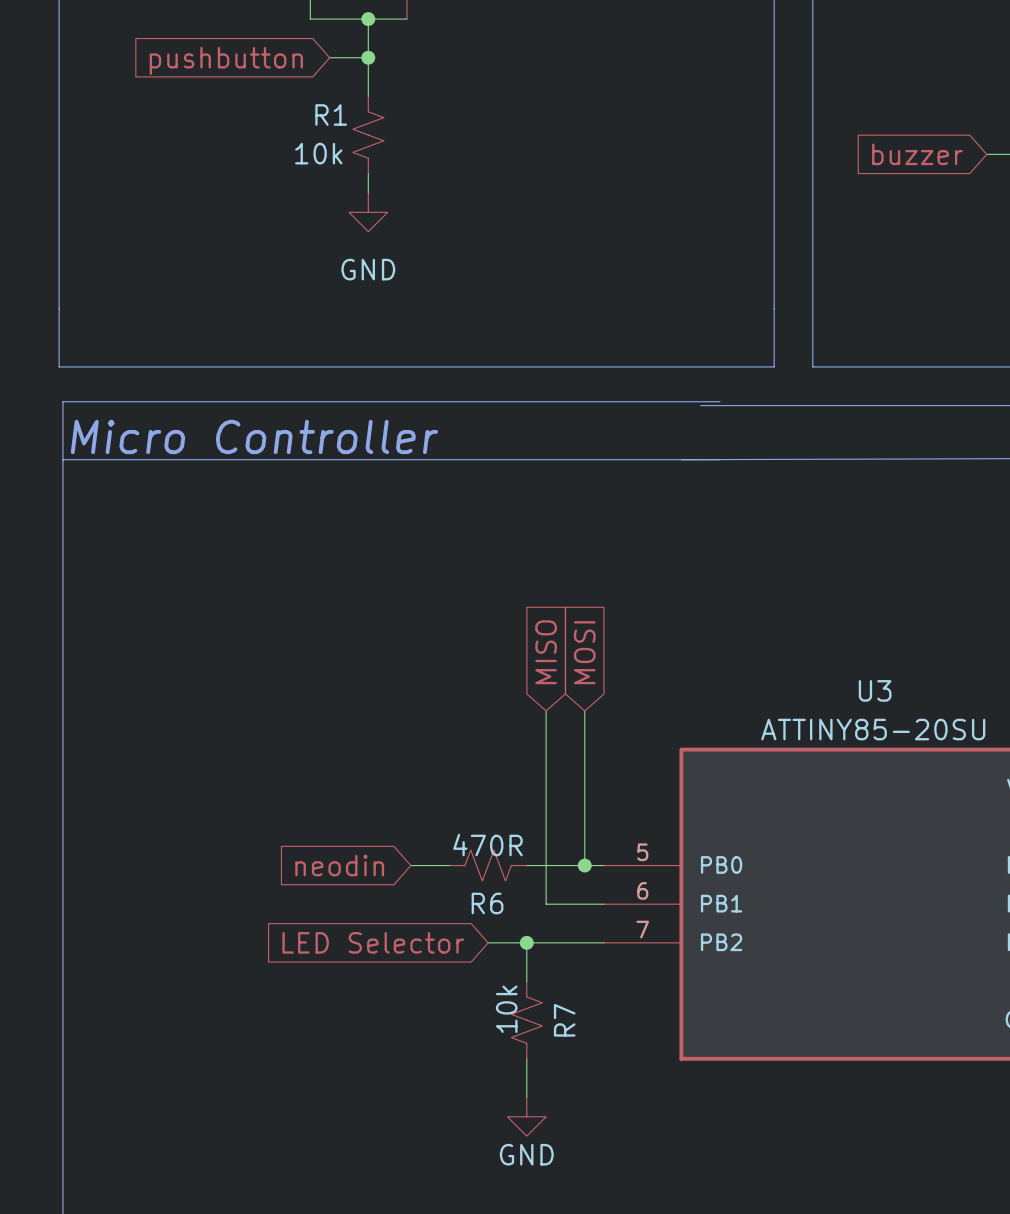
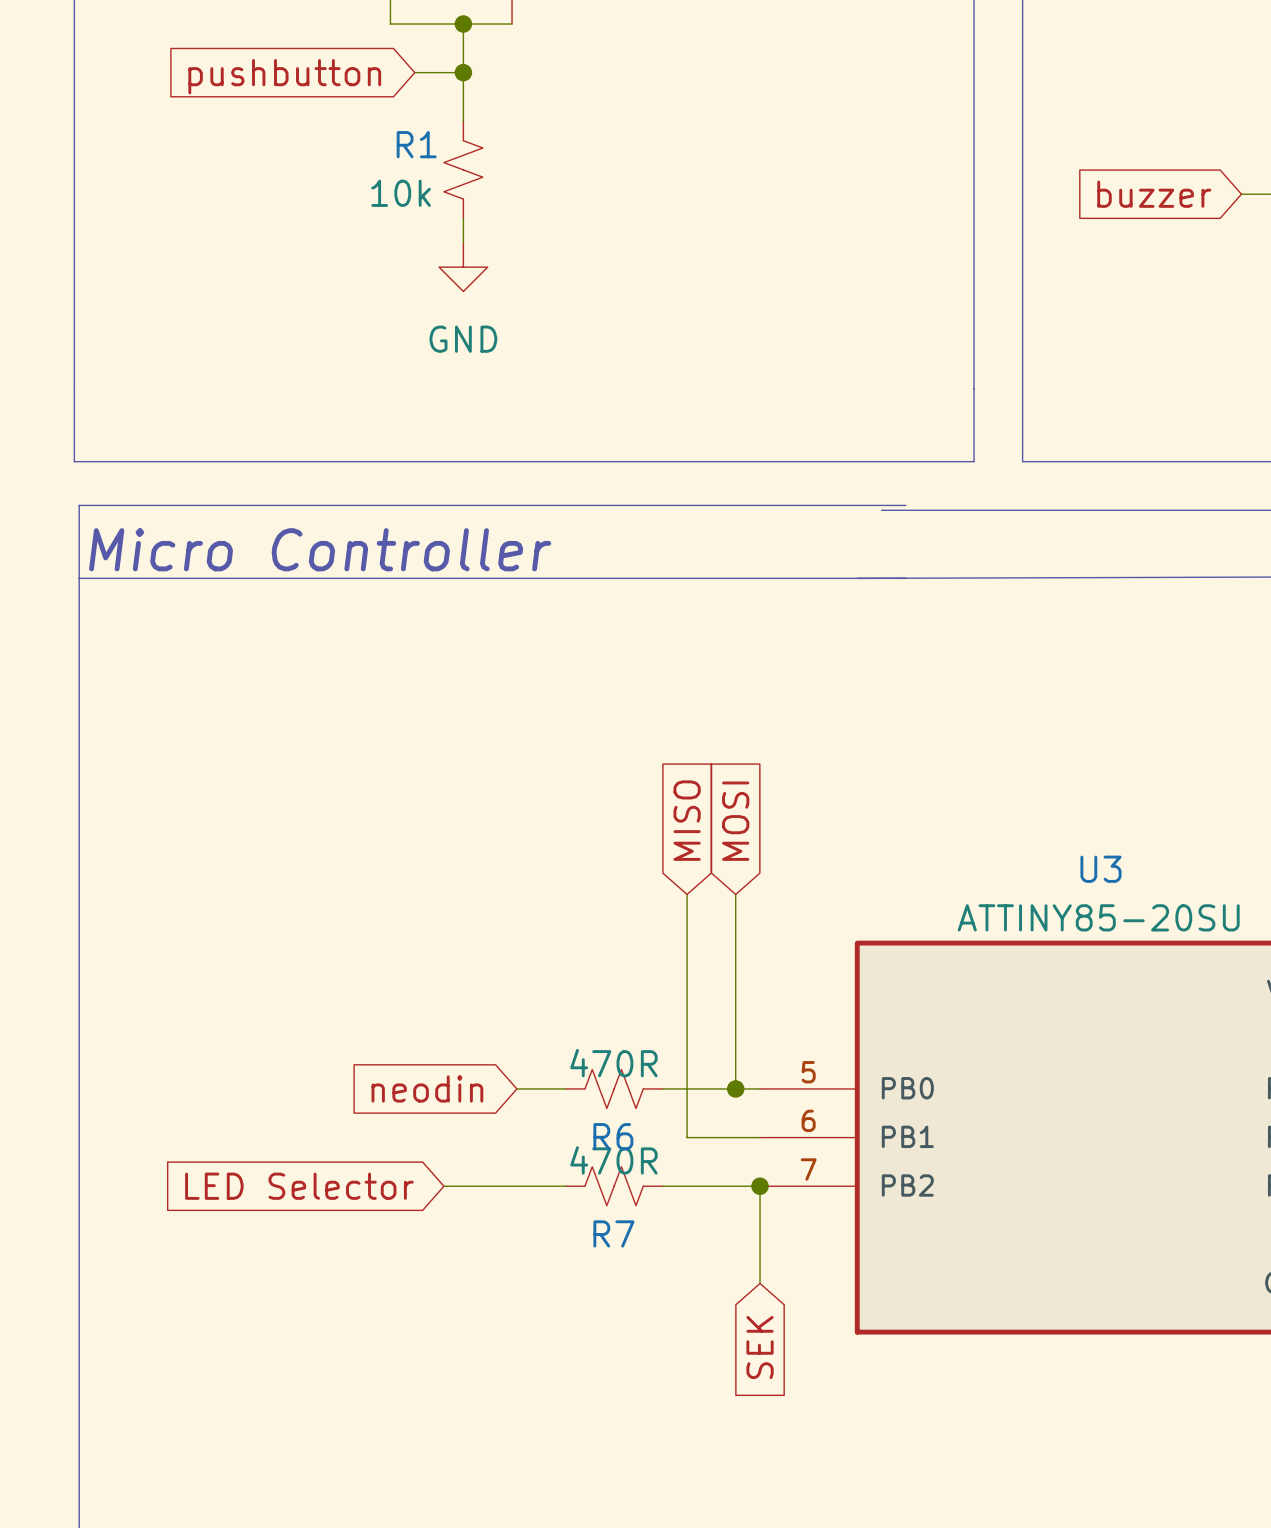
wire: none -> (443, 1186) (565, 1186)
global label position: LED Selector (373, 942) -> LED Selector (299, 1186)
wire: (488, 942) (526, 942) (526, 981) -> none
junction position: (526, 942) -> (760, 1186)
wire: none -> (760, 1186) (760, 1283)
R7 value: 10k (506, 1009) -> 470R (613, 1160)
R7 rotation: 0° (526, 1020) -> 90° clockwise (614, 1186)
R7 position: (526, 1020) -> (614, 1186)
wire: (526, 1058) (526, 1097) -> none
global label: none -> SEK (760, 1347)
power symbol: GND (526, 1116) -> none

